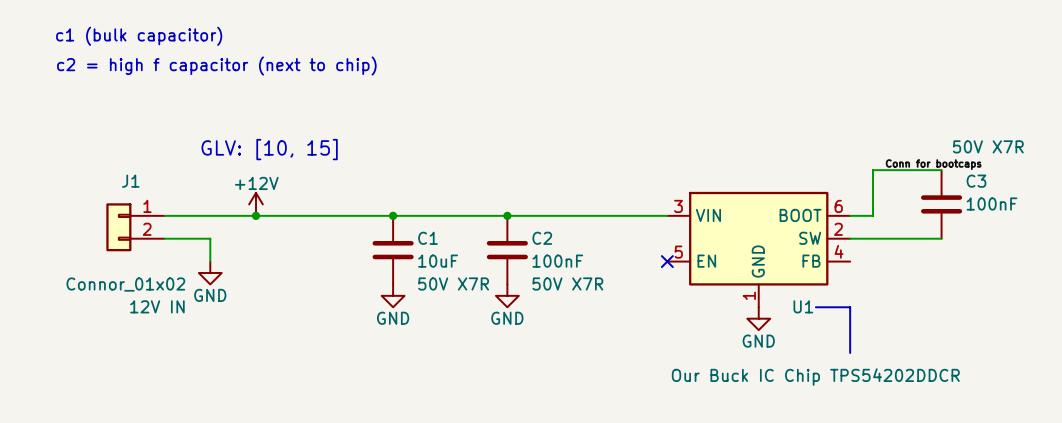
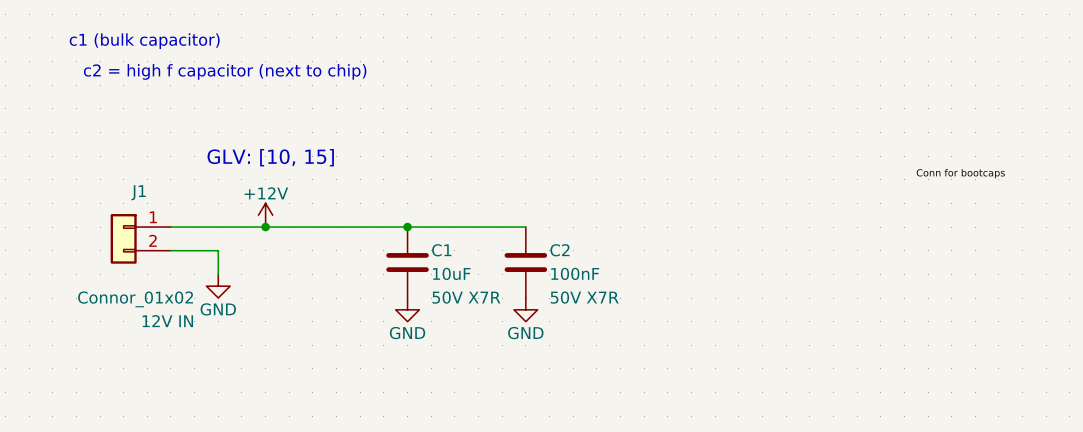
wire: (941, 170) (873, 170) (873, 215) (850, 215) -> none
C3: 100nF (941, 204) -> none
wire: (507, 215) (667, 215) -> none
junction: (507, 215) -> none
wire: (850, 238) (941, 238) -> none
U1: Our Buck IC Chip TPS54202DDCR (758, 249) -> none
no-connect mark: (667, 261) -> none
line: (815, 307) (850, 307) (850, 352) -> none
power symbol: GND (758, 318) -> none

